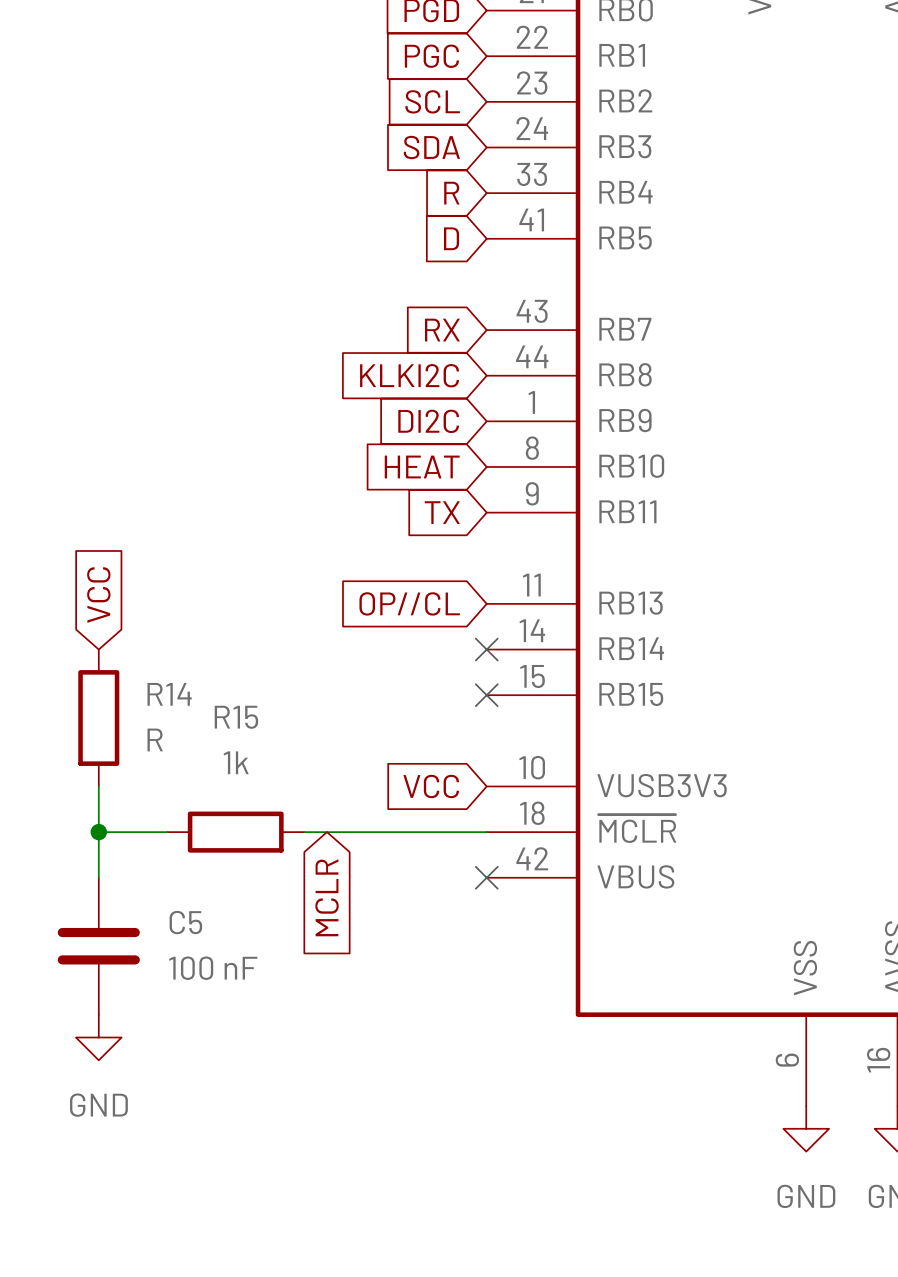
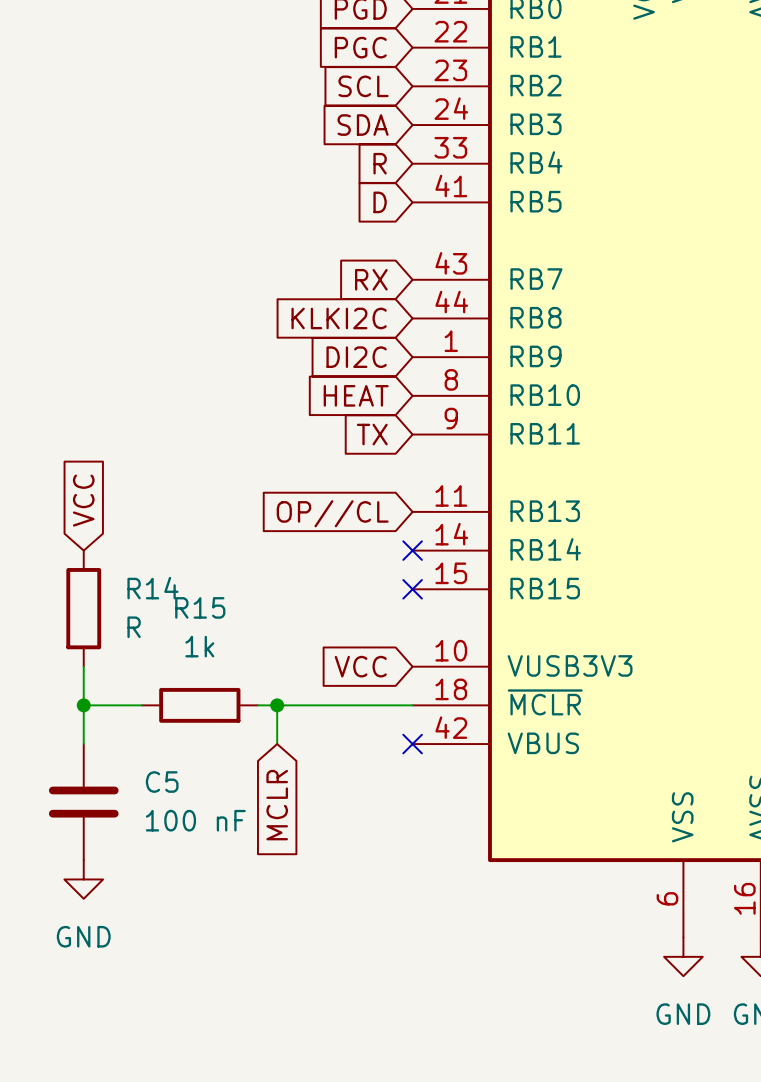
wire: none -> (277, 705) (277, 744)
junction: none -> (277, 705)
global label position: MCLR (327, 897) -> MCLR (277, 805)

